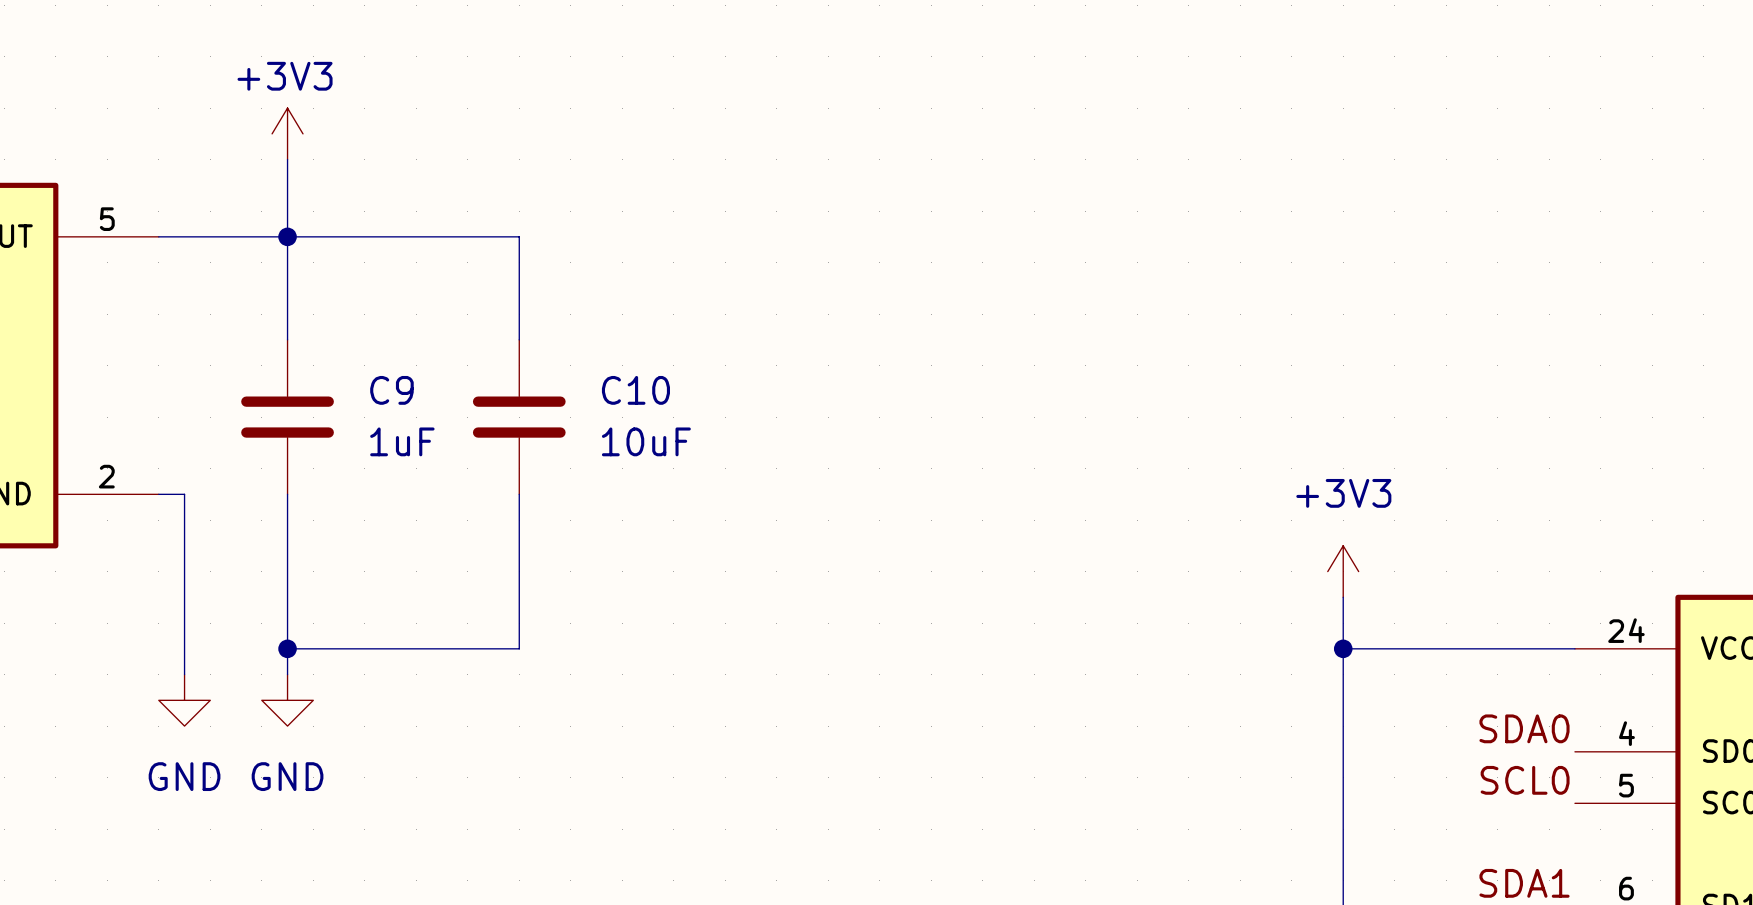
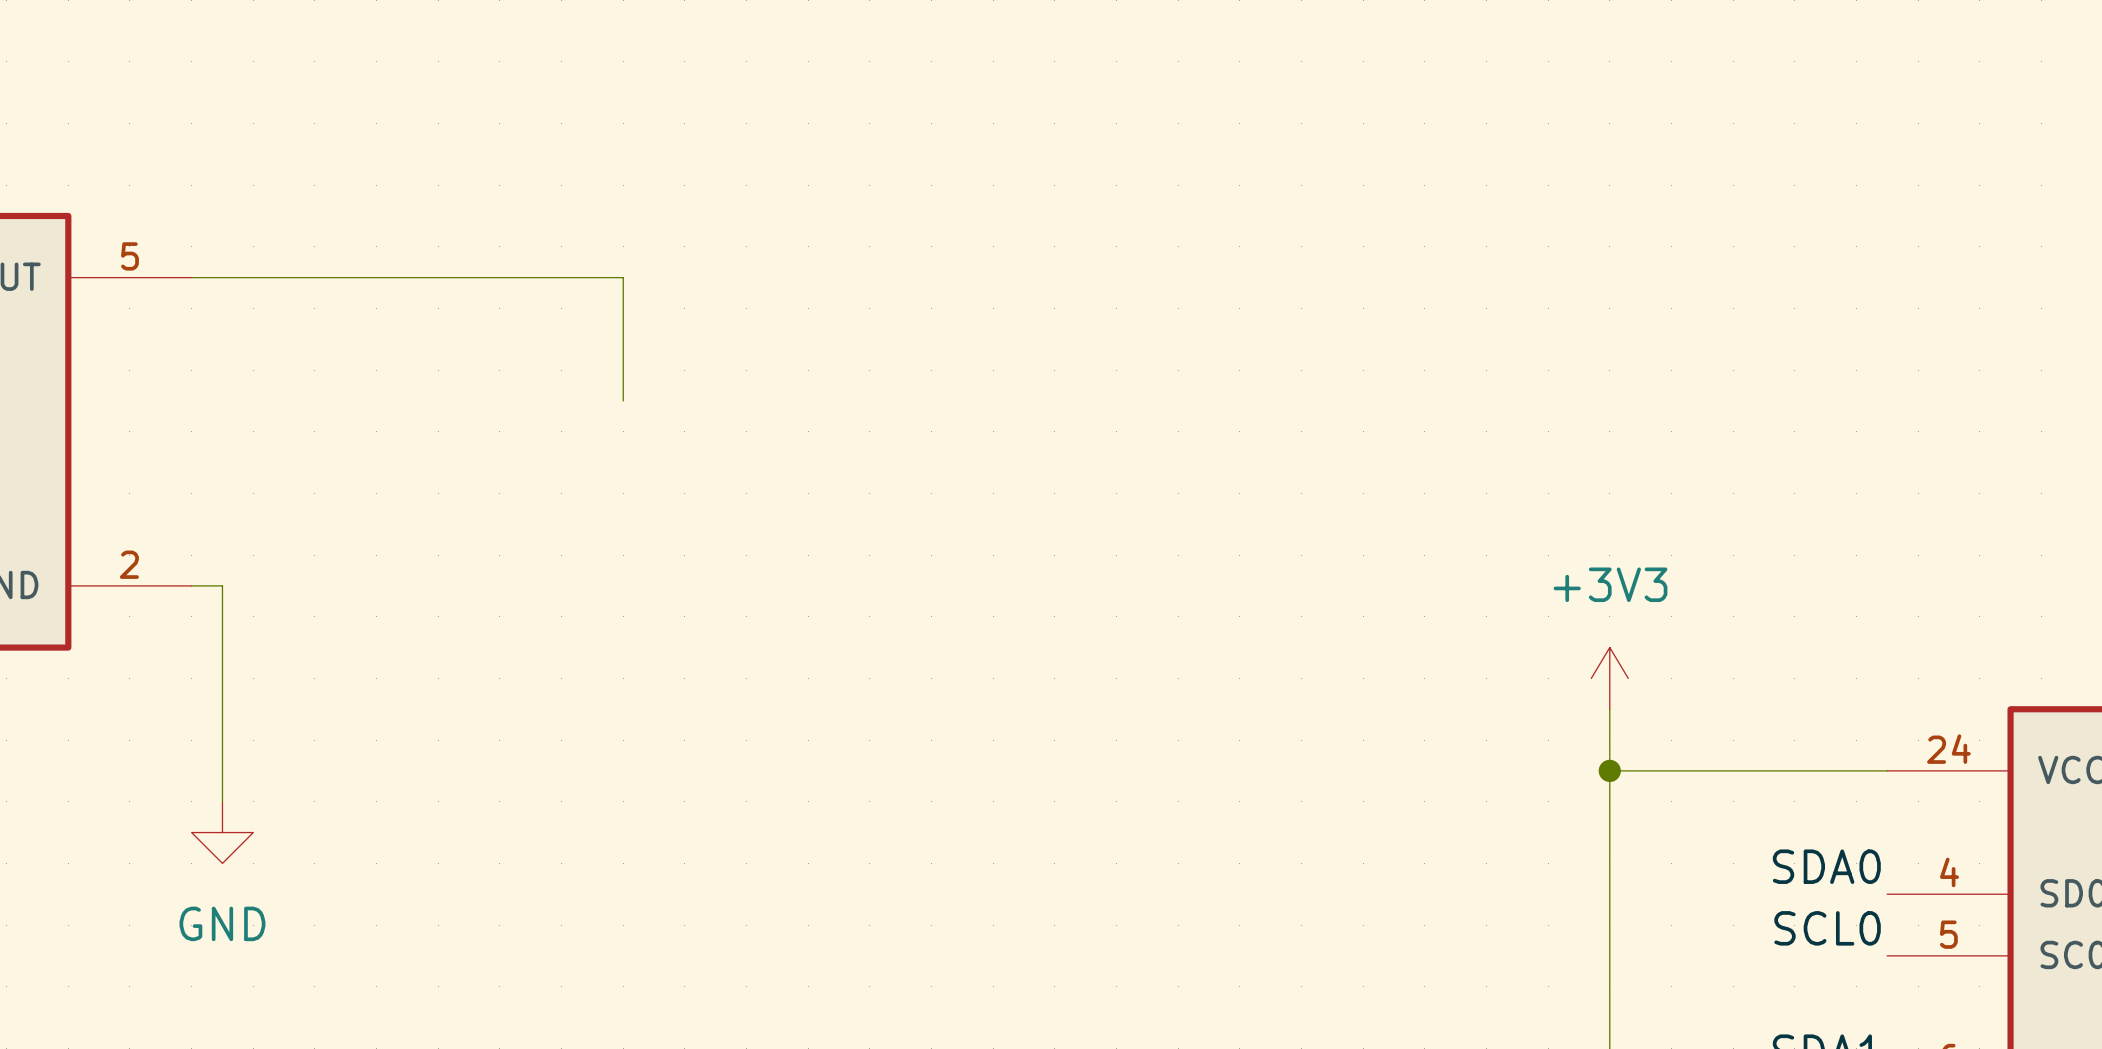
power symbol: +3V3 (287, 133) -> none
wire: (287, 159) (287, 339) -> none
junction: (287, 236) -> none
C9: 1uF (287, 417) -> none
C10: 10uF (519, 417) -> none
wire: (287, 494) (287, 674) -> none
wire: (519, 494) (519, 648) (287, 648) -> none
junction: (287, 648) -> none
power symbol: GND (287, 700) -> none

